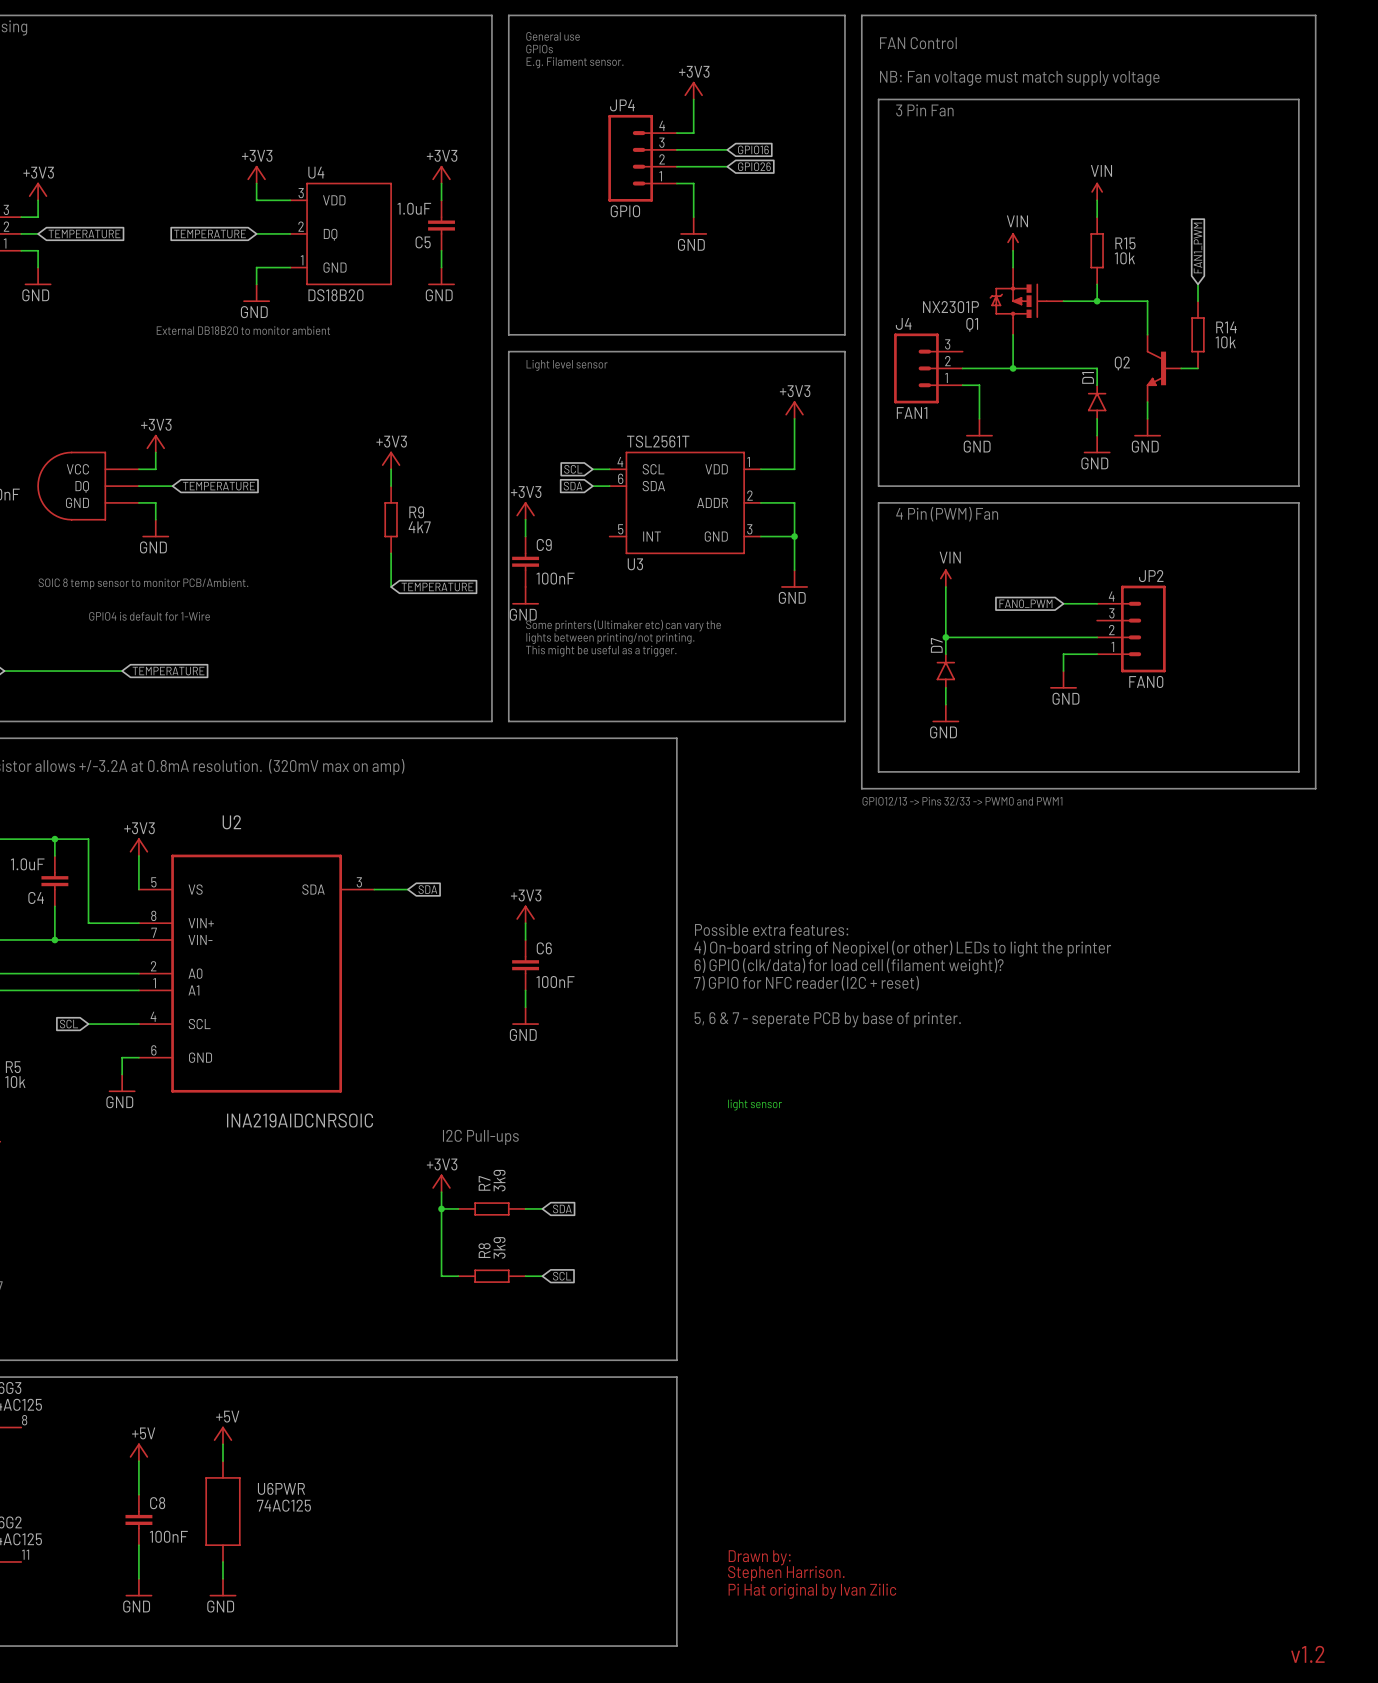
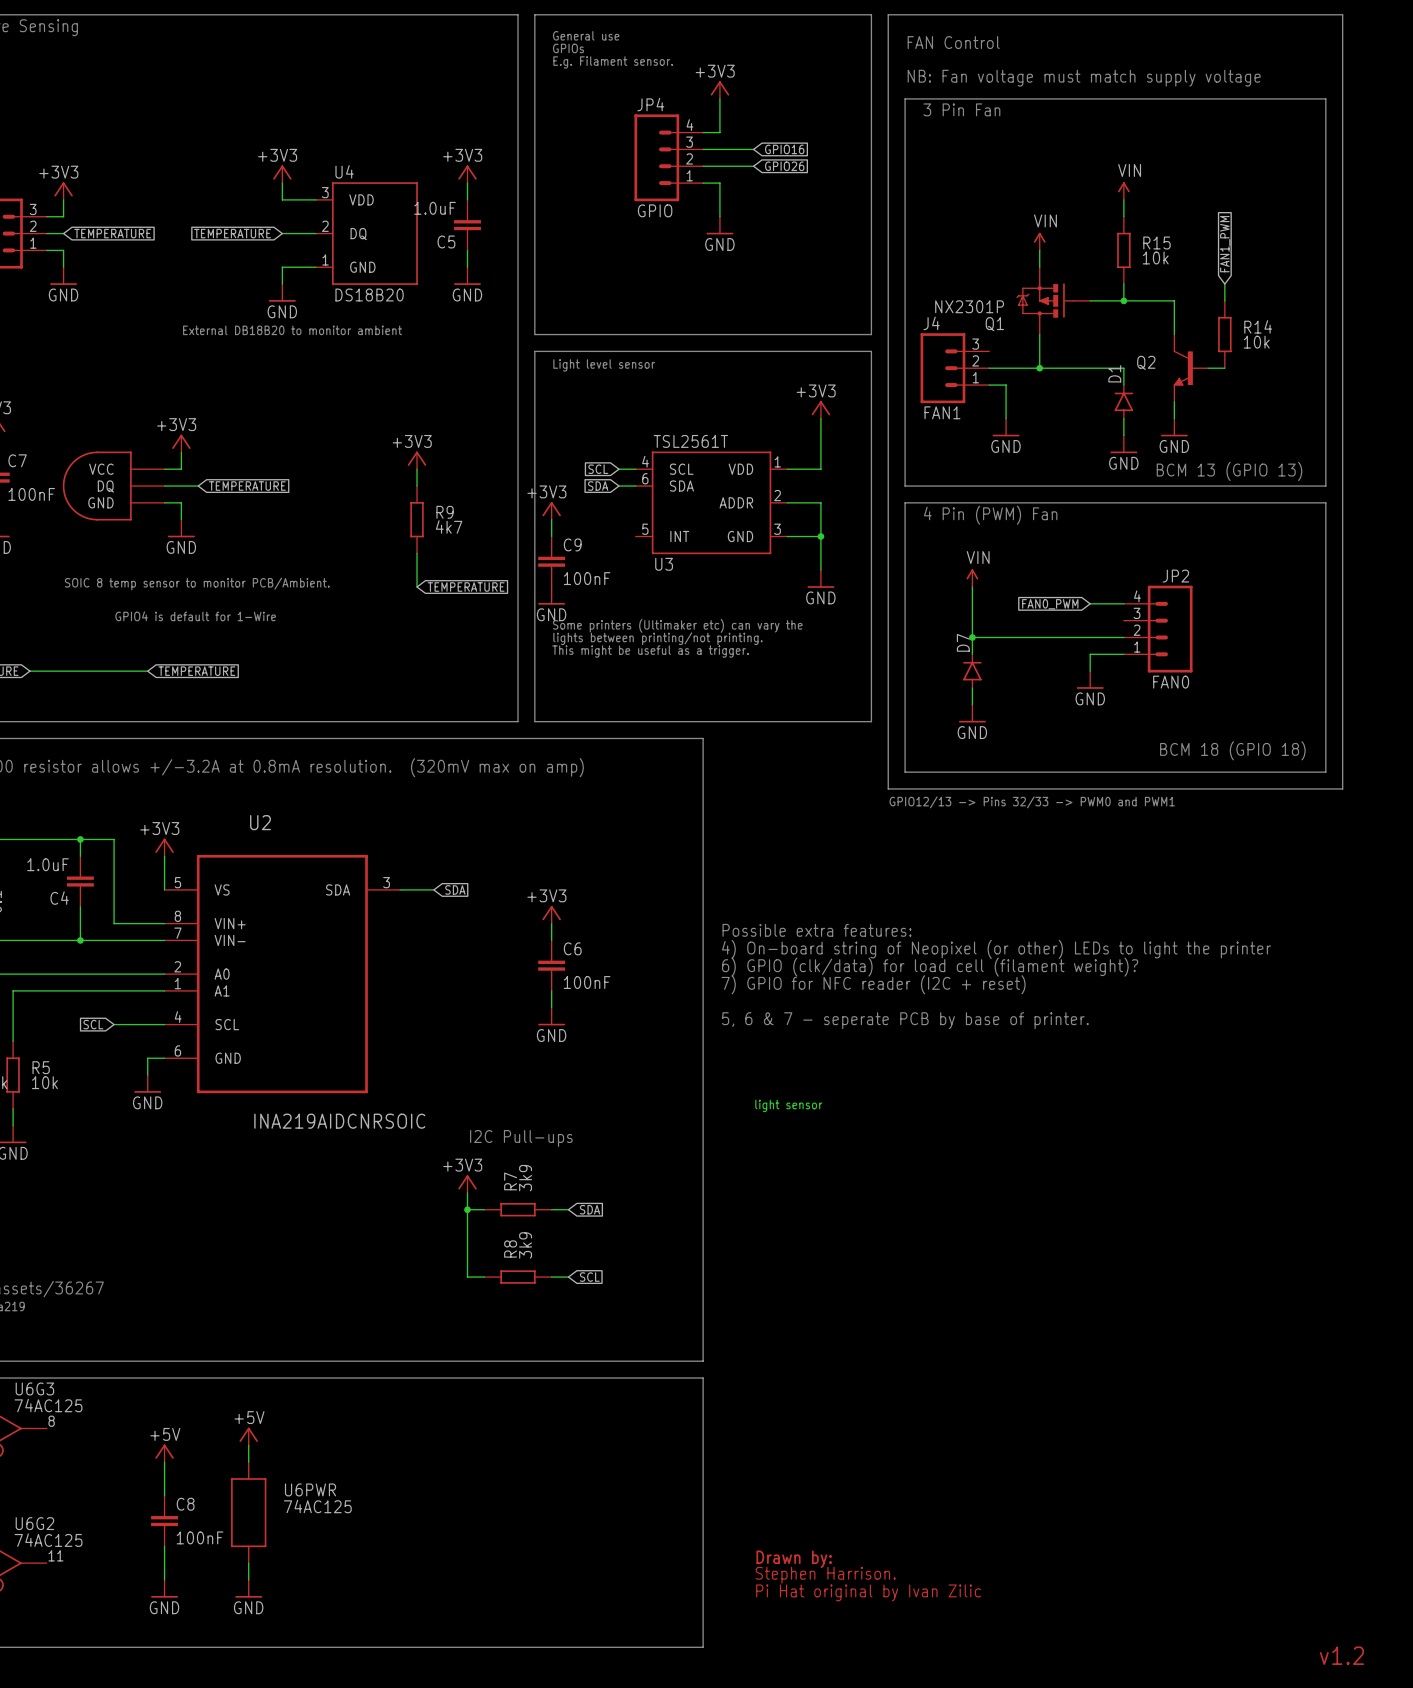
text: none -> BCM 13 (GPIO 13) (1229, 471)
text: none -> BCM 18 (GPIO 18) (1232, 750)

